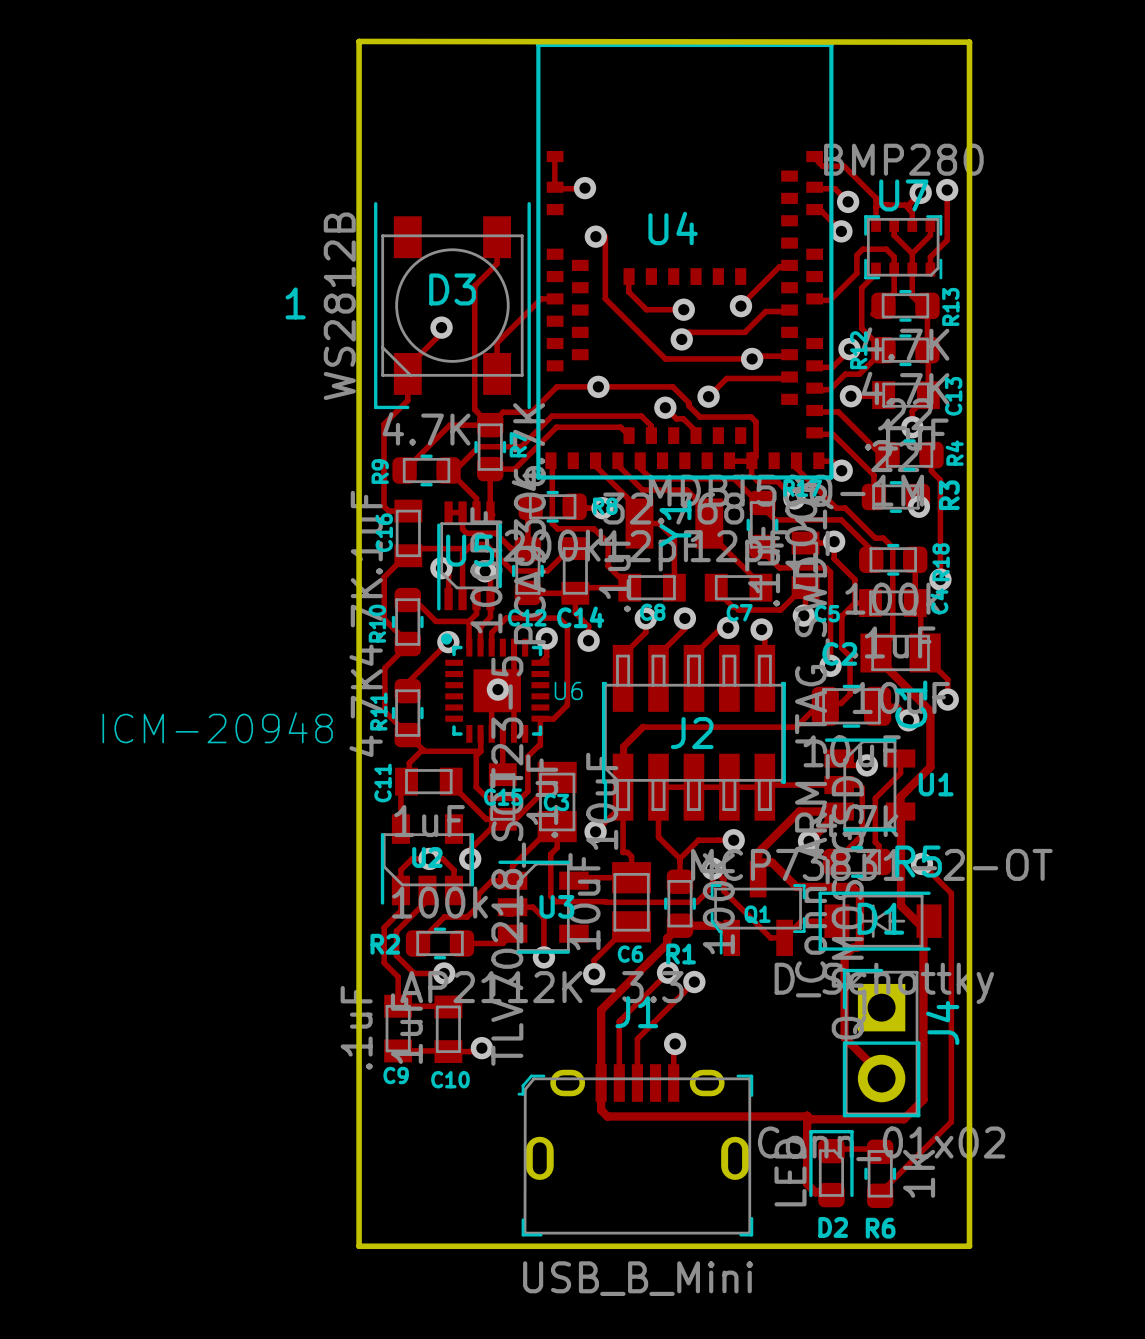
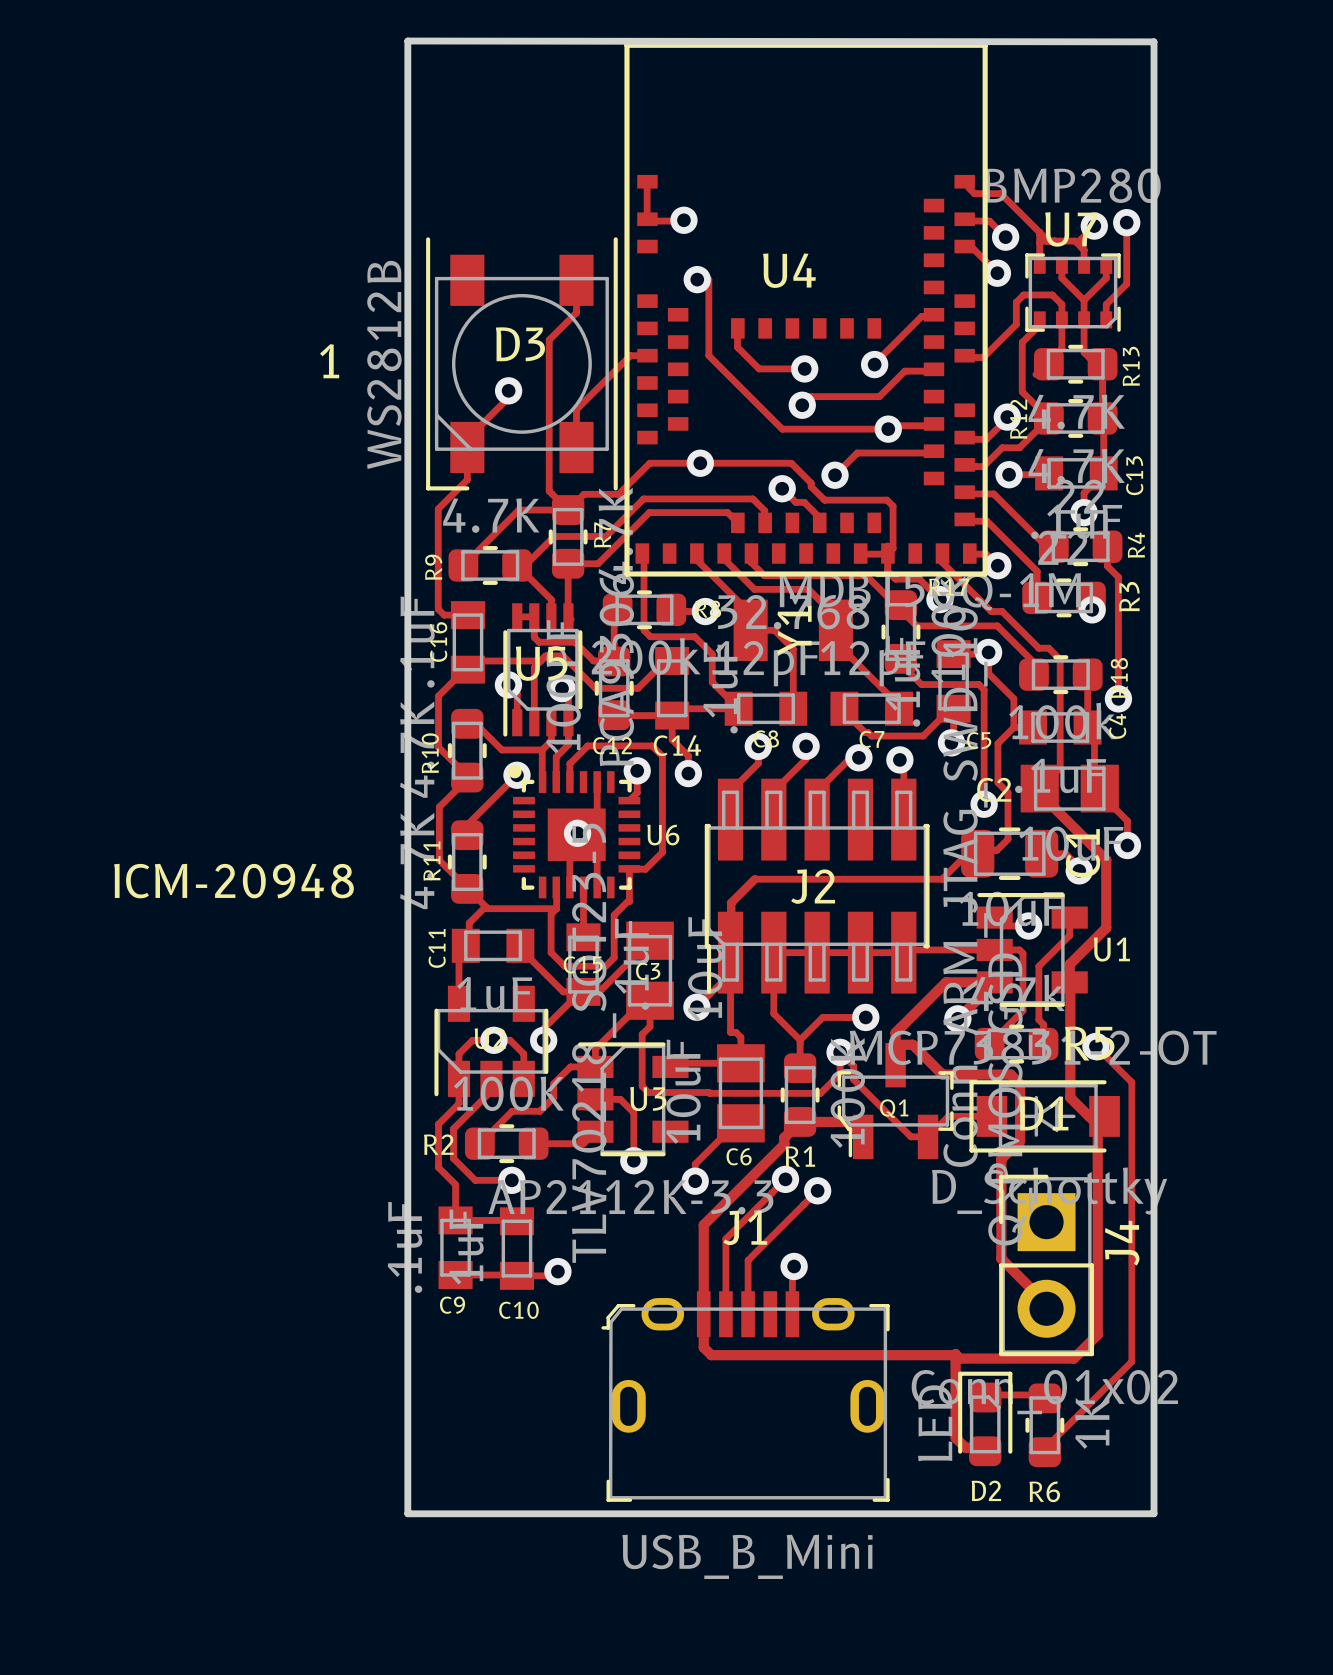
R2 value: 100k (440, 902) -> 100K (508, 1093)

